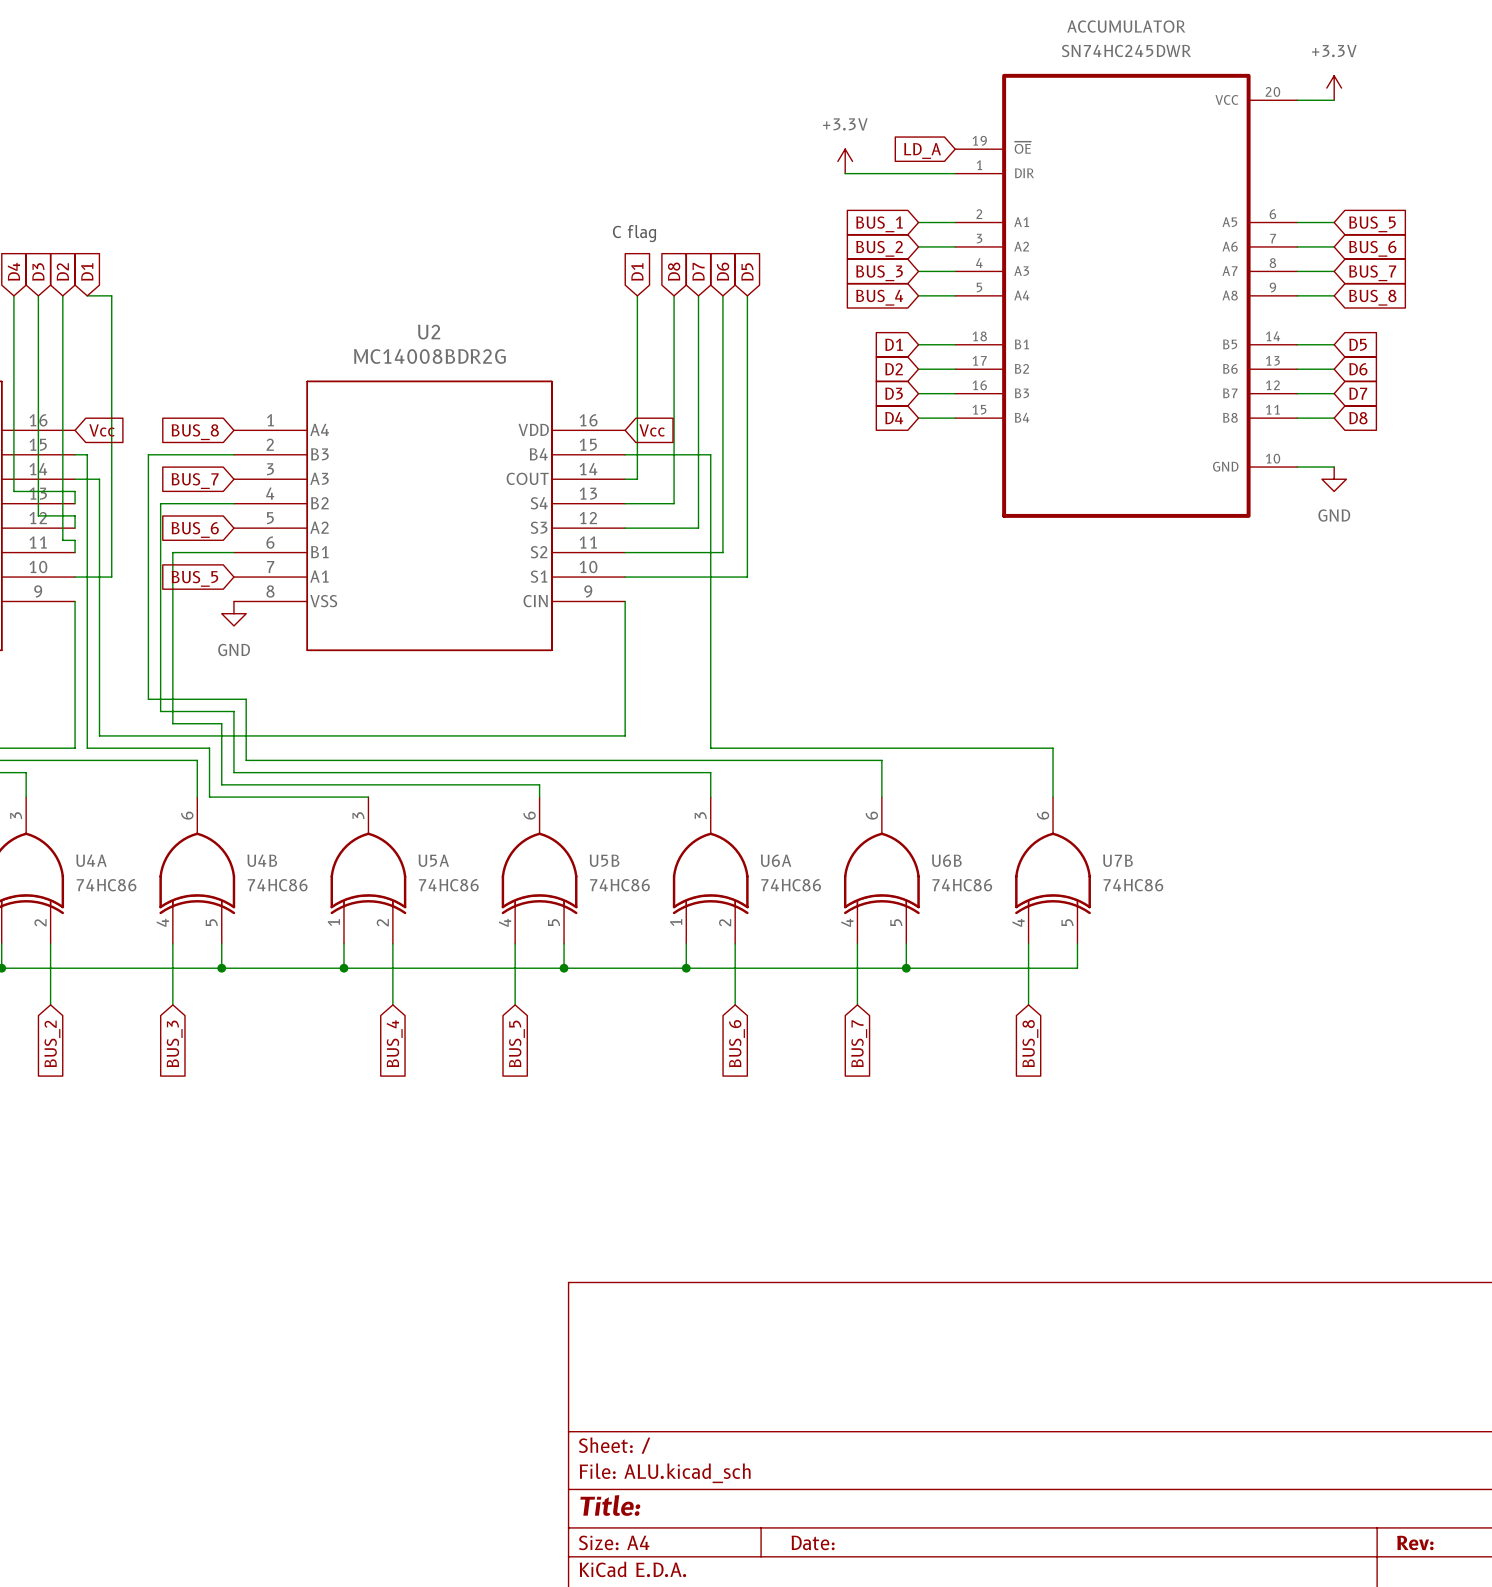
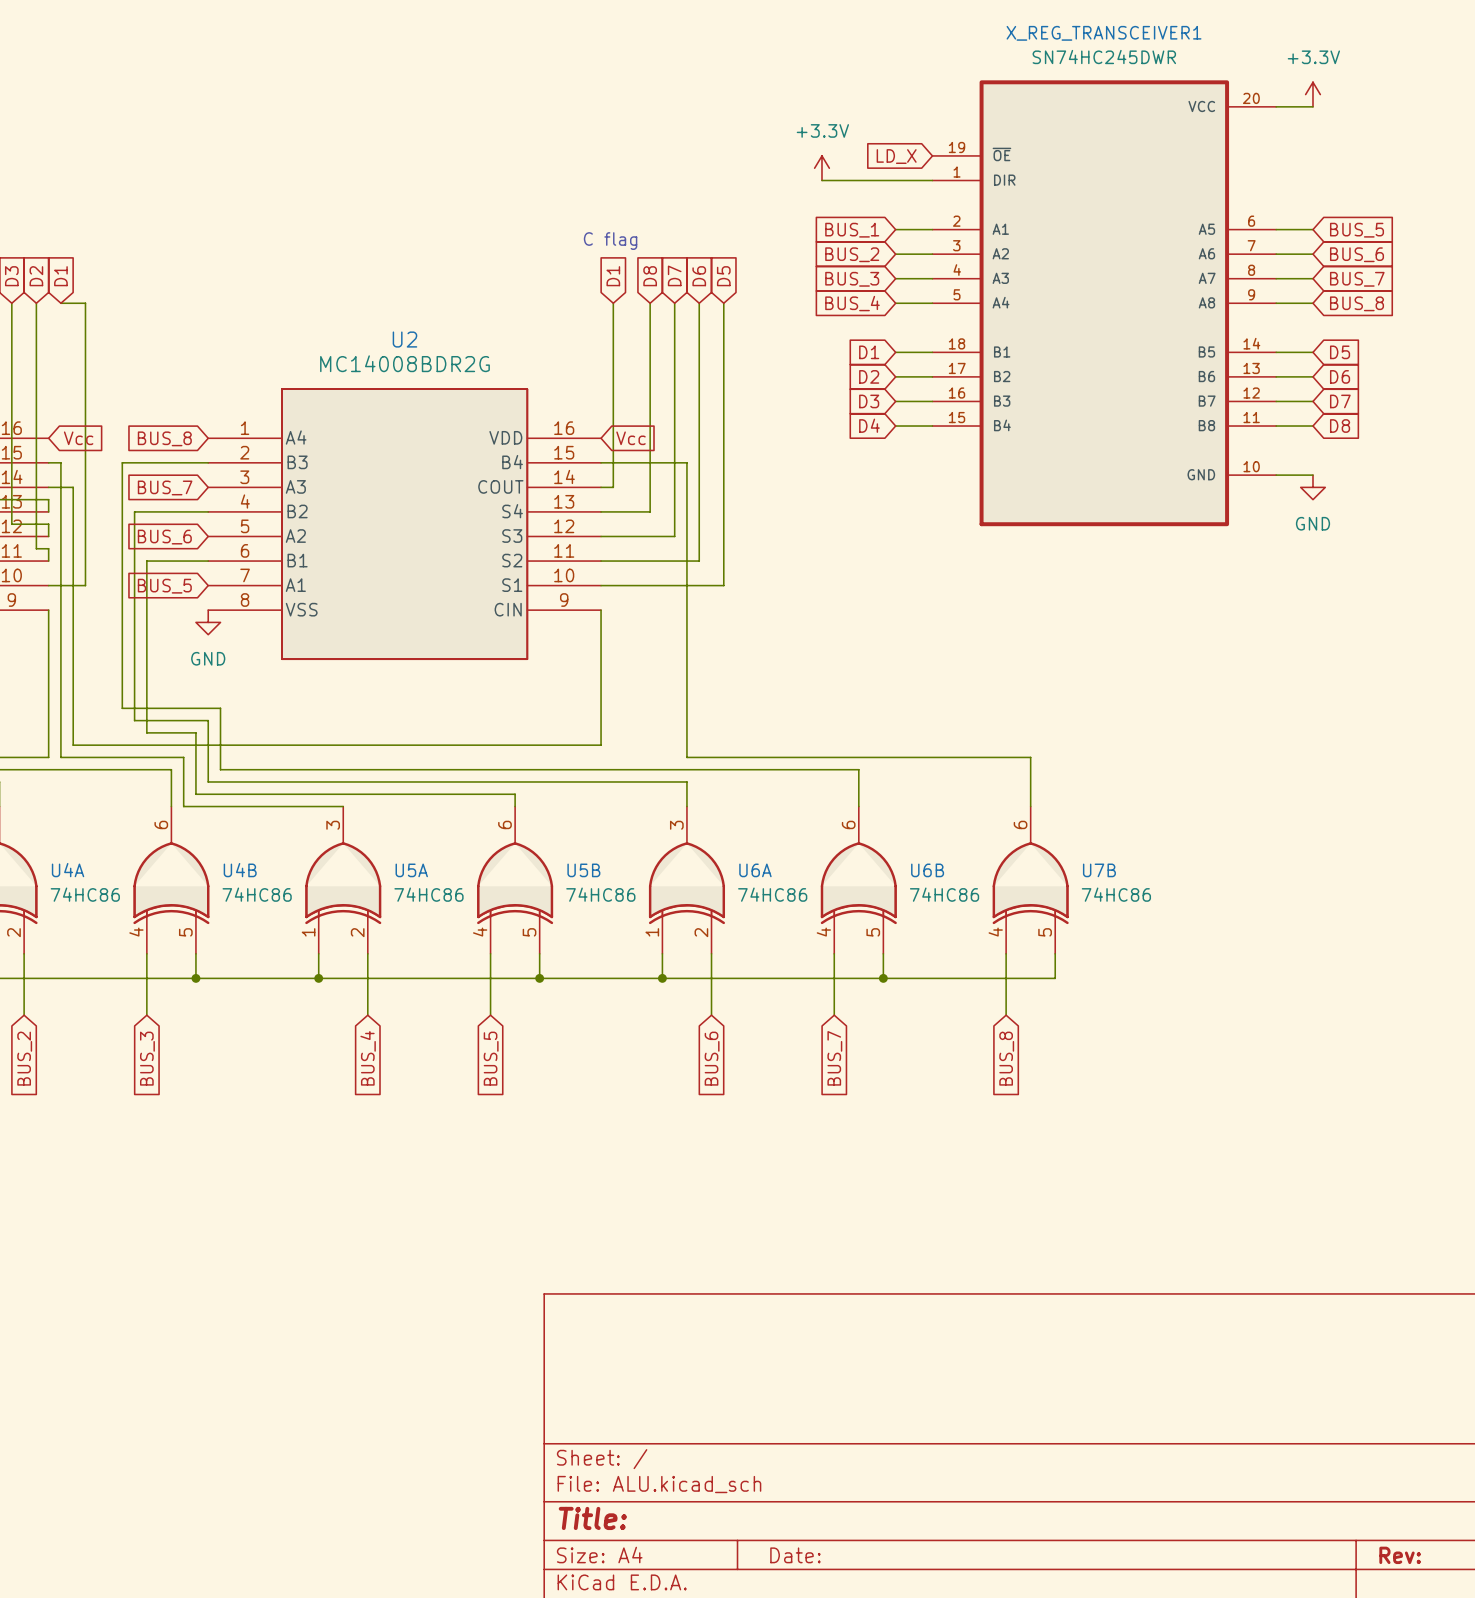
ACCUMULATOR name: ACCUMULATOR (1126, 26) -> X_REG_TRANSCEIVER1 (1104, 33)
global label: LD_A (922, 151) -> LD_X (896, 156)

